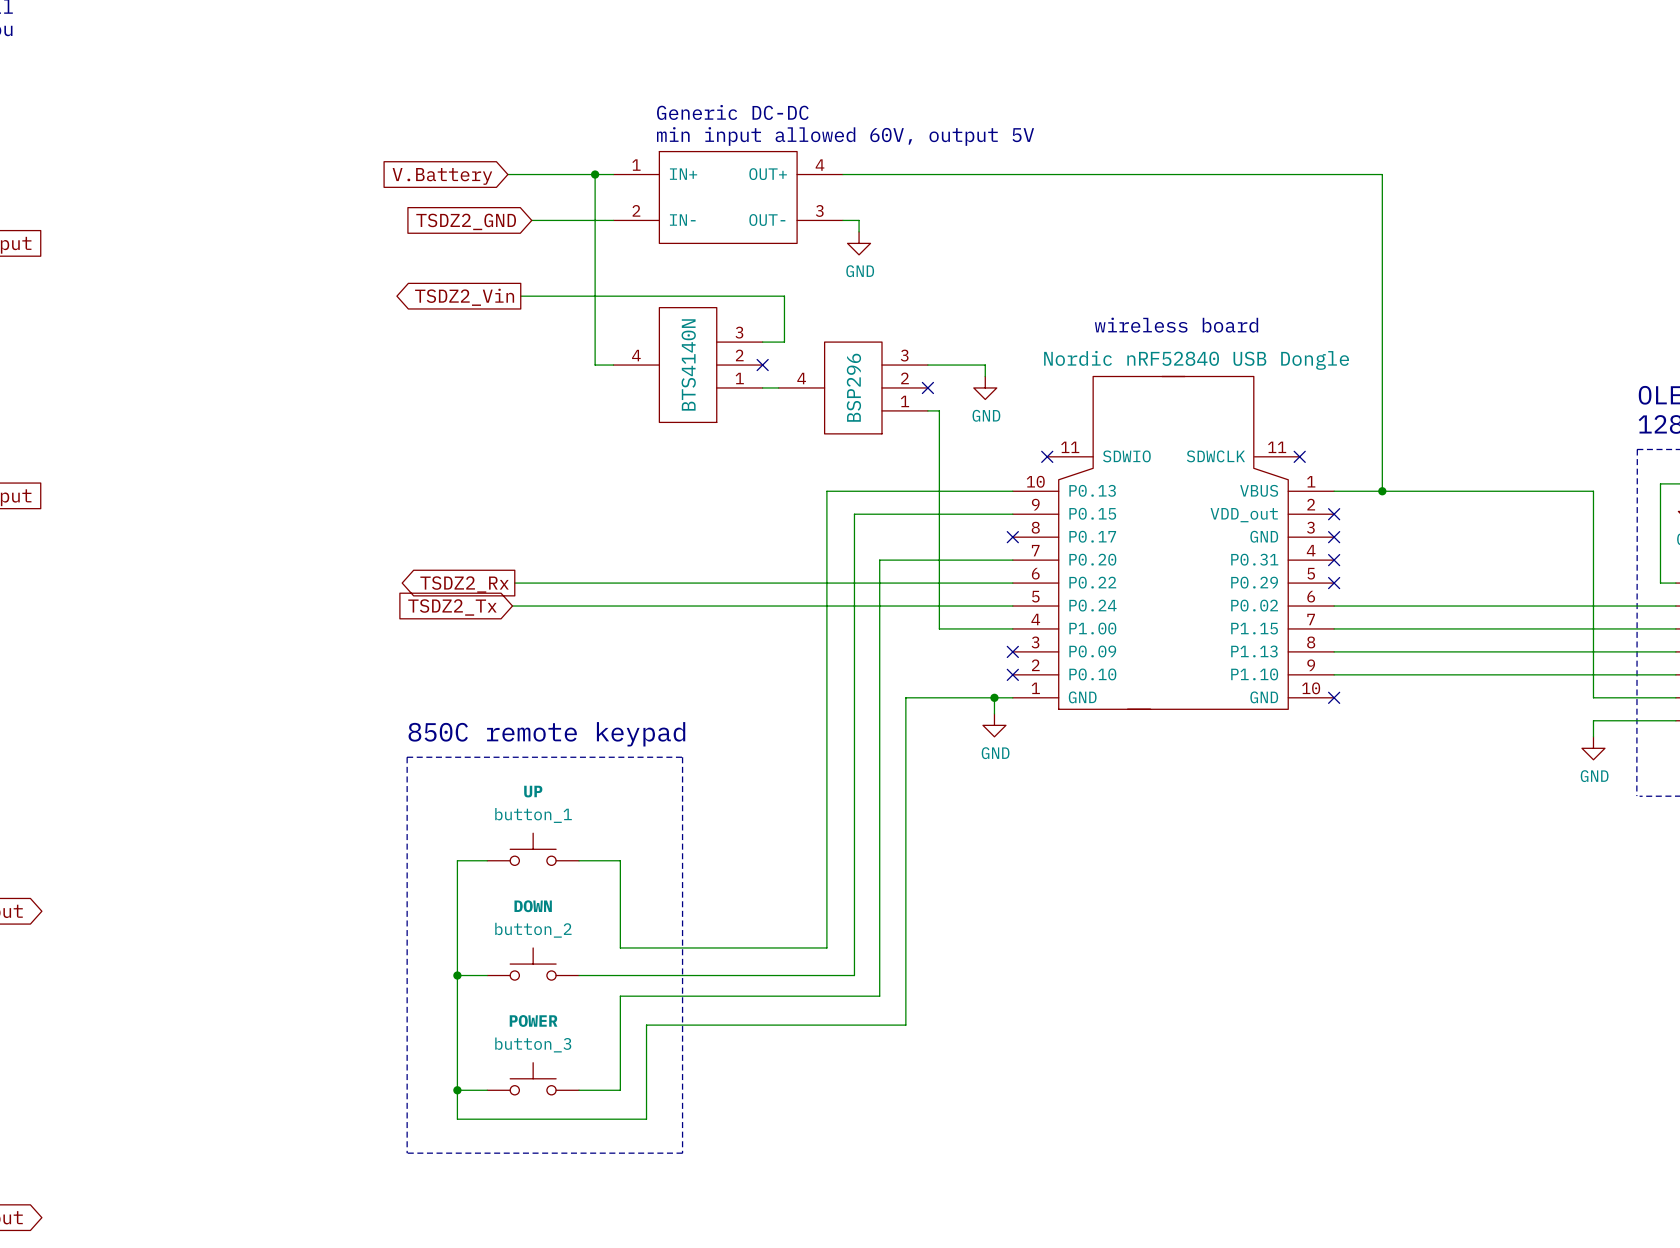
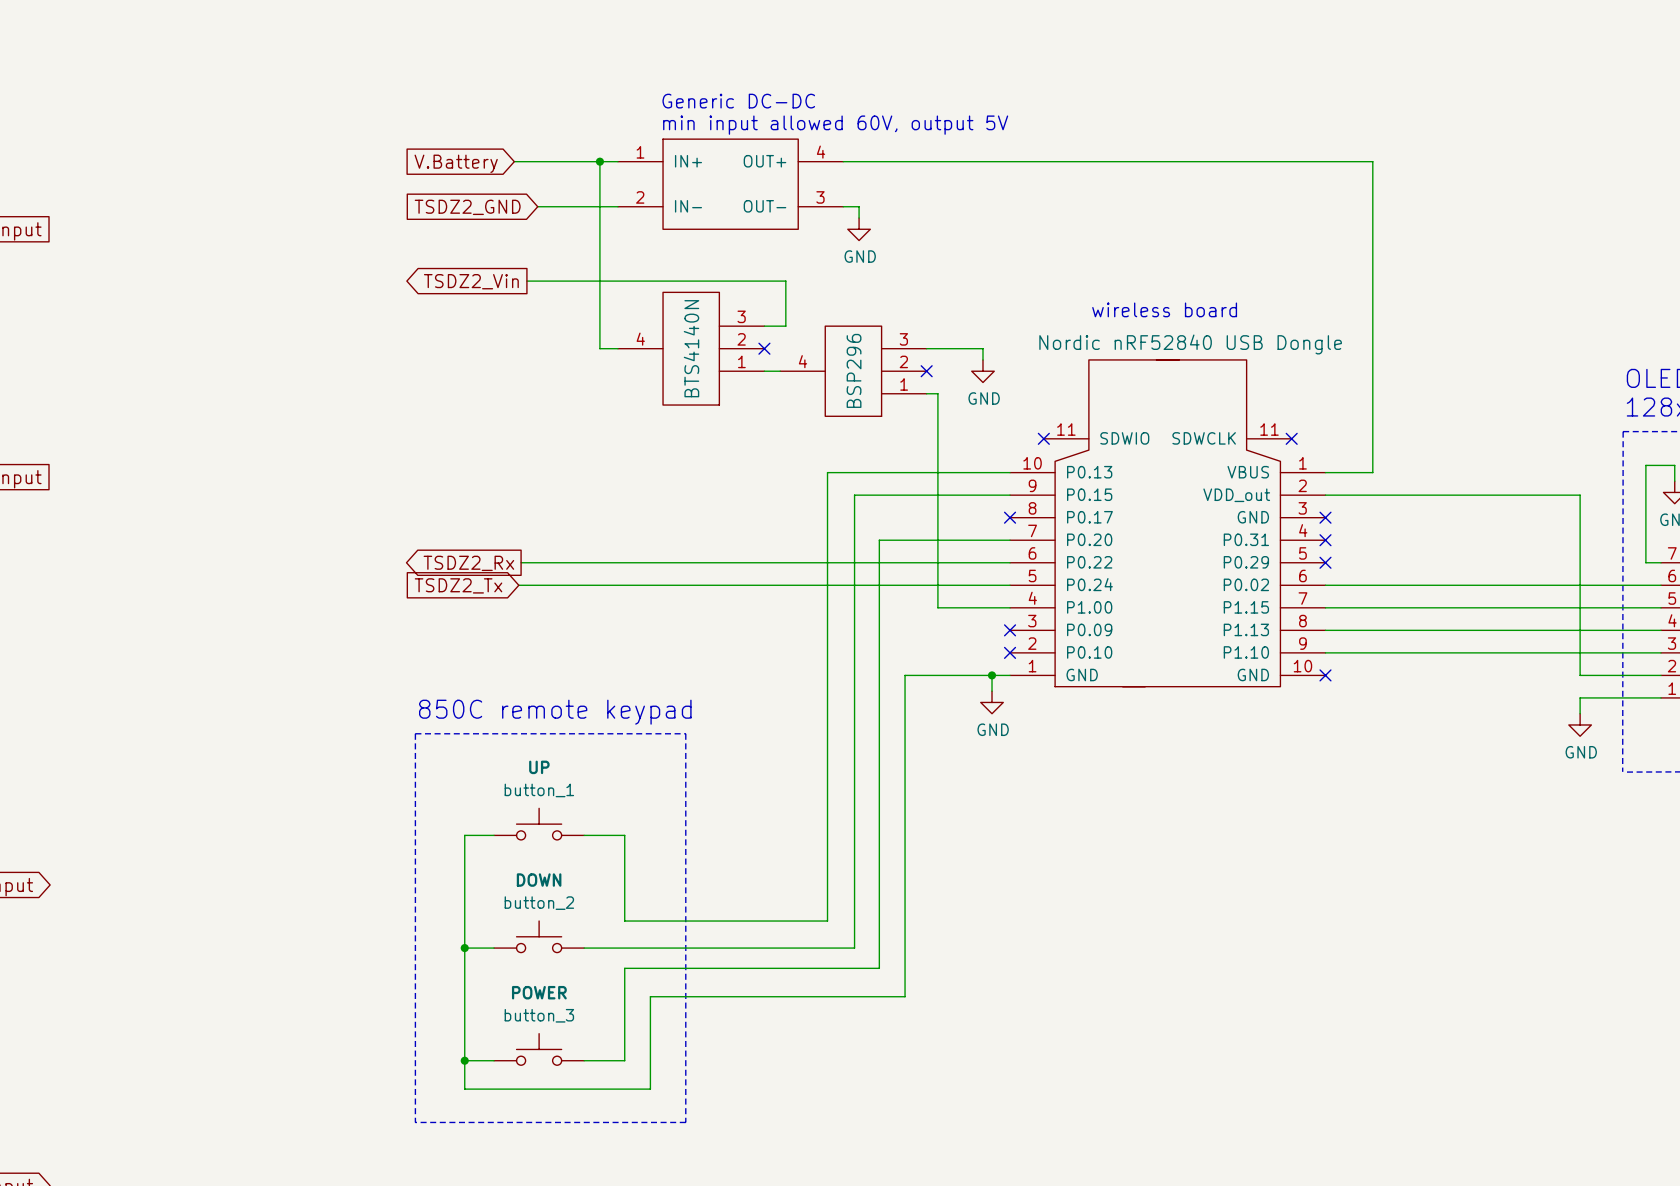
wire: (1382, 491) (1593, 491) (1593, 514) -> (1325, 495) (1580, 495)
junction: (1382, 491) -> none
no-connect mark: (1334, 514) -> none

